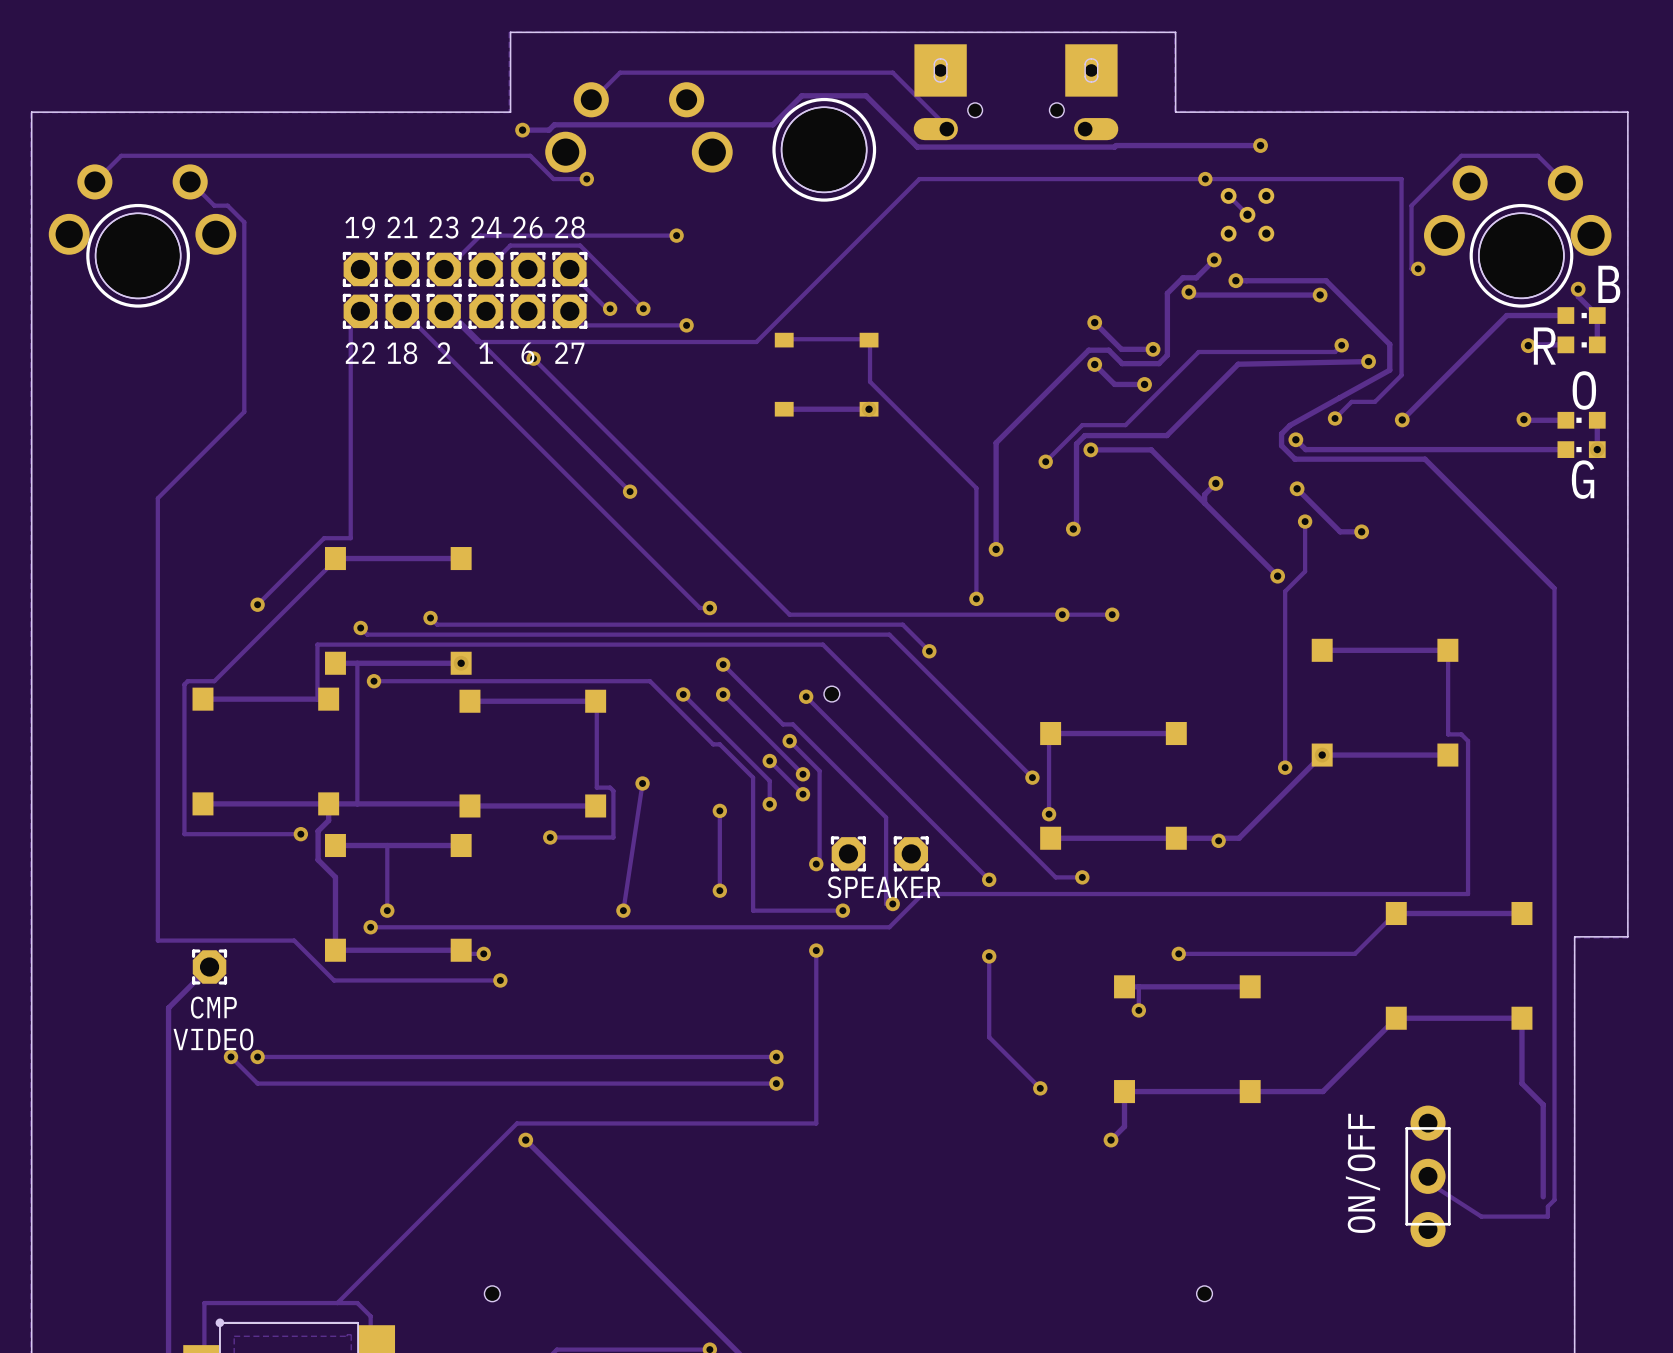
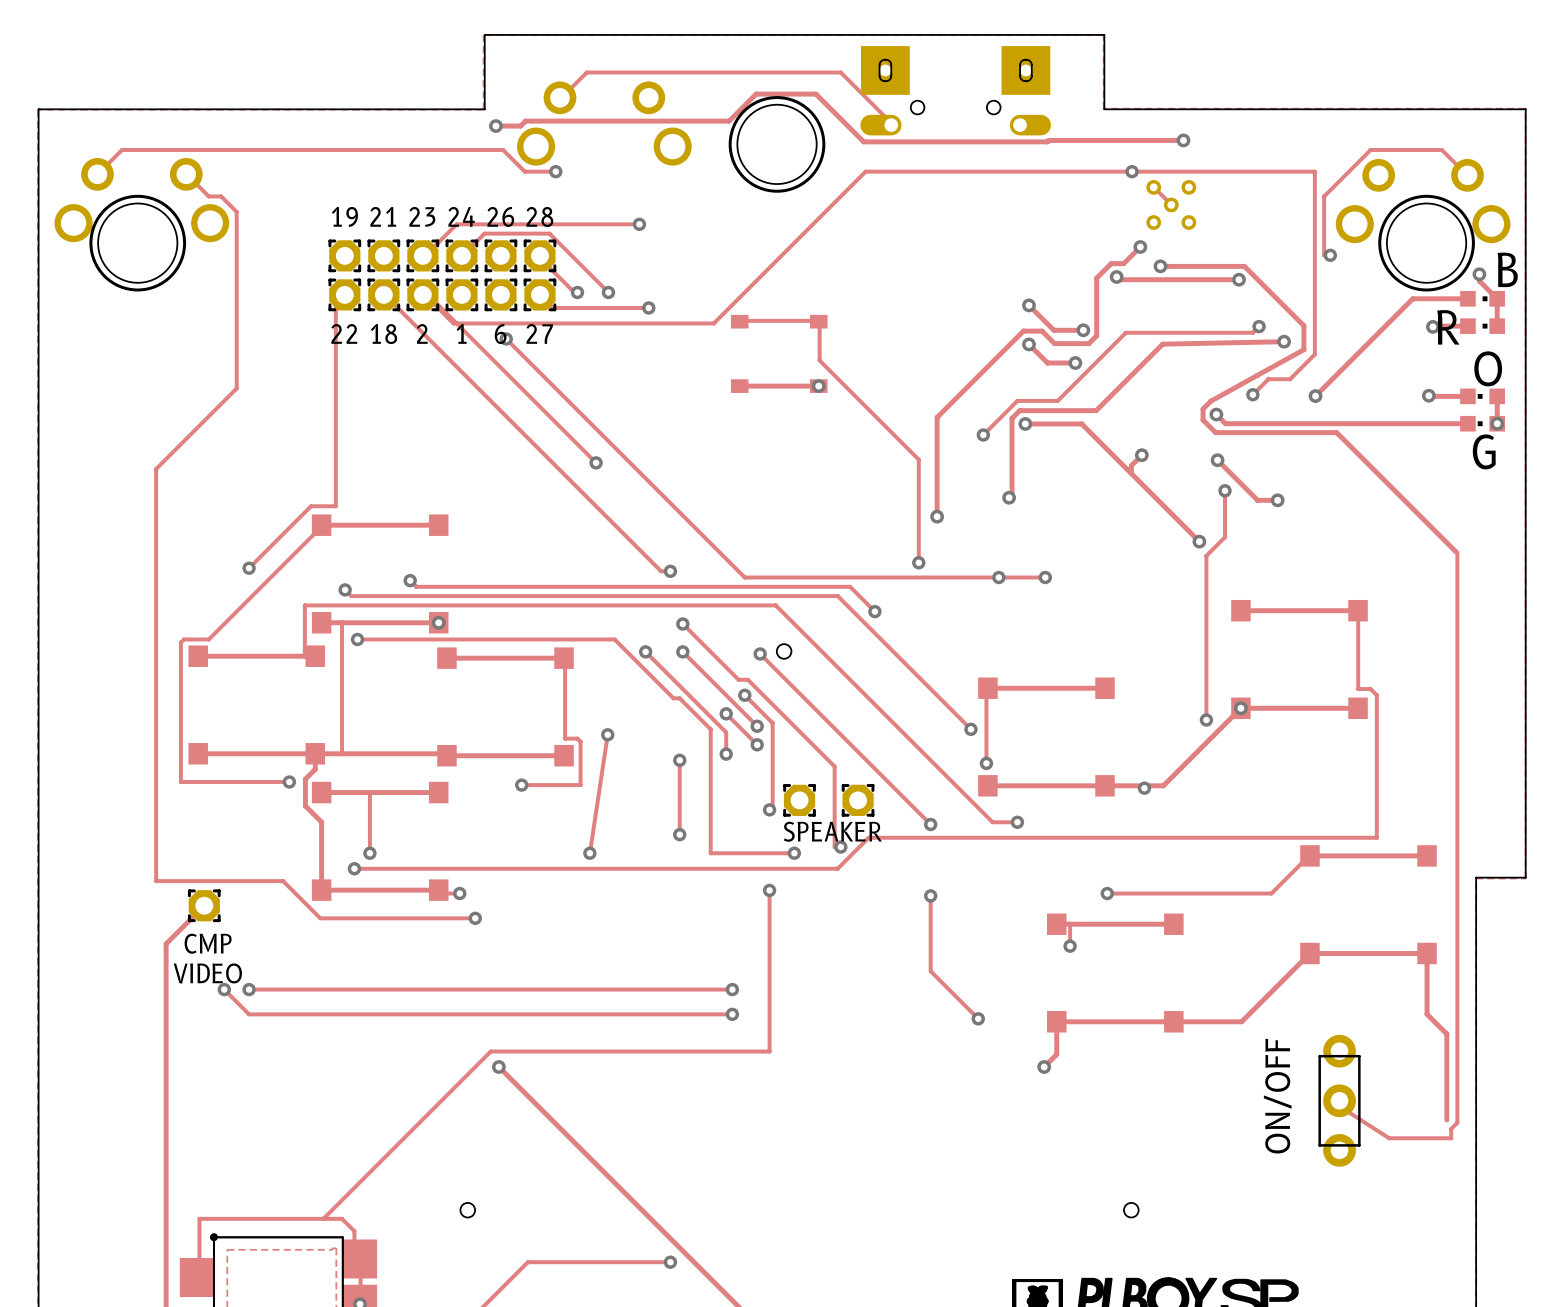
hole: (823, 149) -> none
hole: (138, 255) -> none
hole: (1521, 255) -> none

